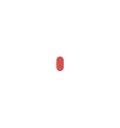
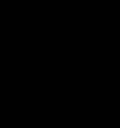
top track: (60, 60) (60, 67) -> none

